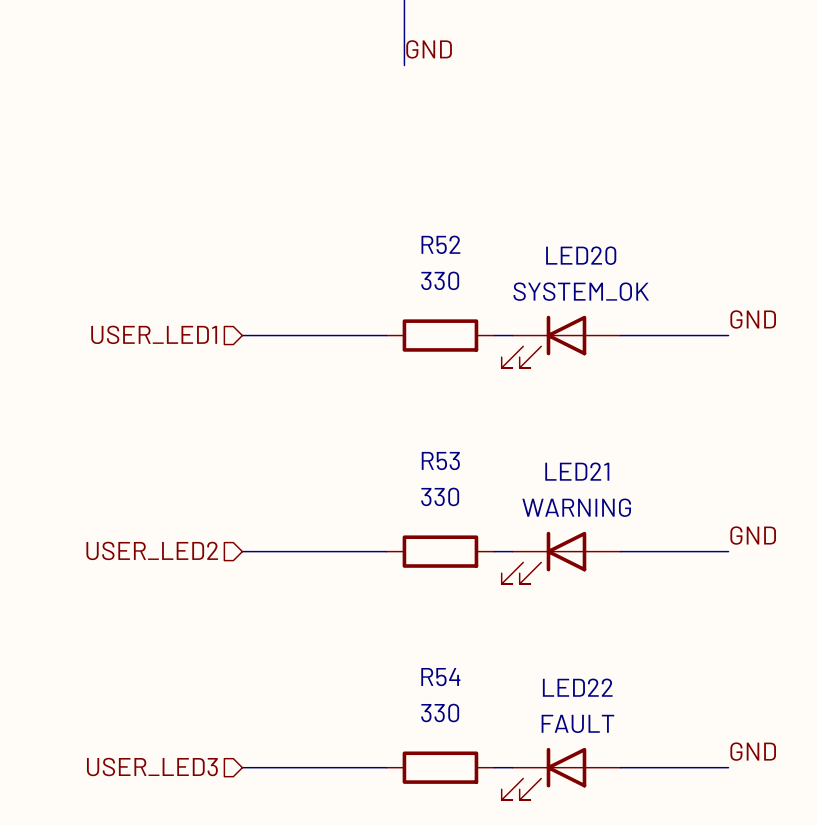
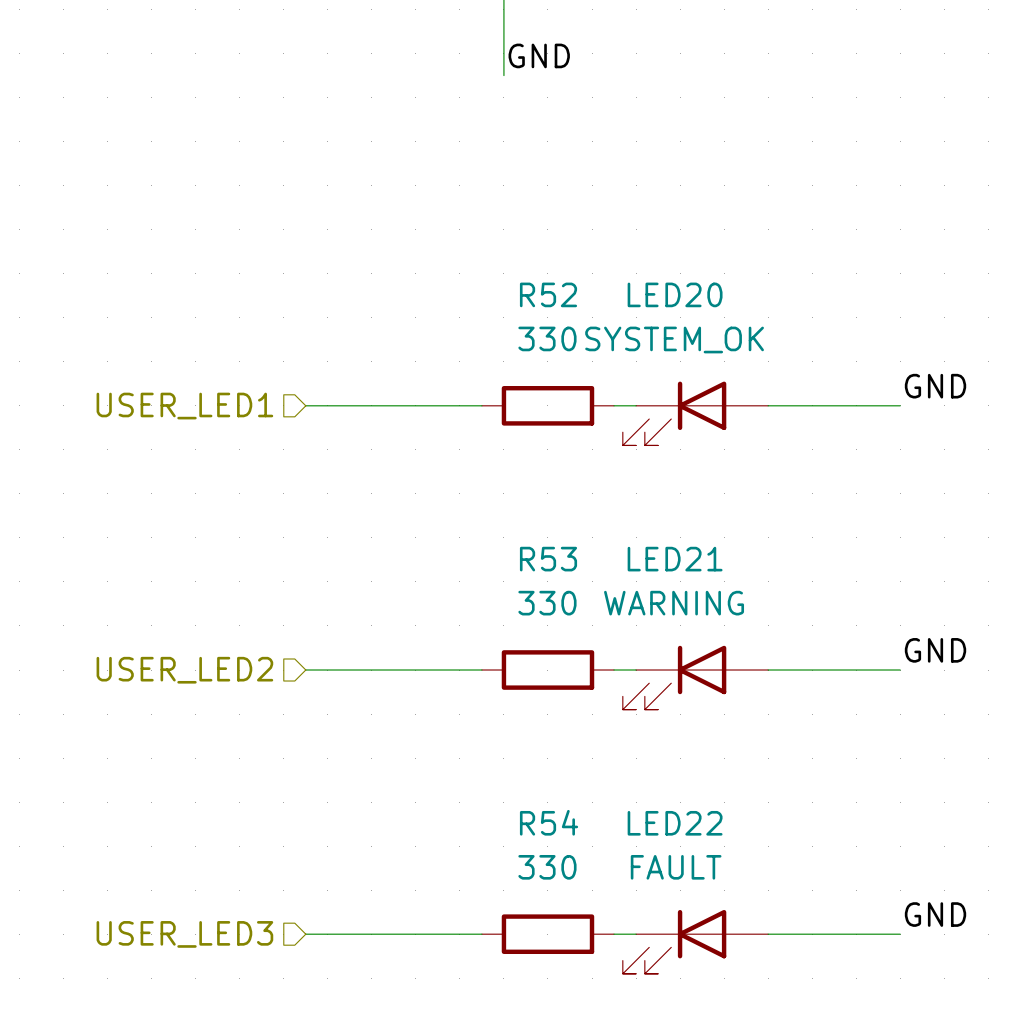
LED20 name position: LED20 (581, 255) -> LED20 (675, 294)
LED20 value position: SYSTEM_OK (581, 291) -> SYSTEM_OK (674, 339)
LED21 name position: LED21 (577, 471) -> LED21 (675, 559)
LED21 value position: WARNING (576, 507) -> WARNING (674, 603)
LED22 name position: LED22 (577, 687) -> LED22 (675, 823)
LED22 value position: FAULT (577, 723) -> FAULT (676, 867)

